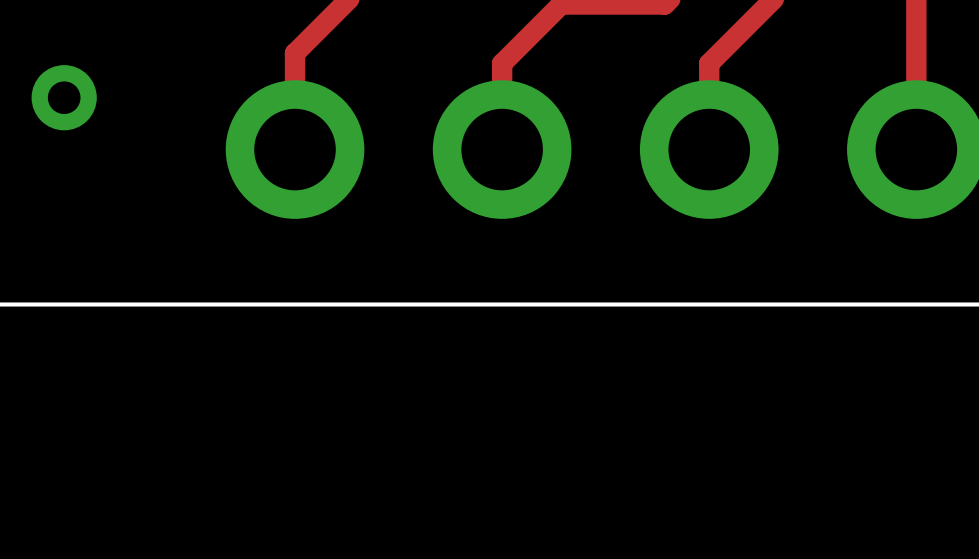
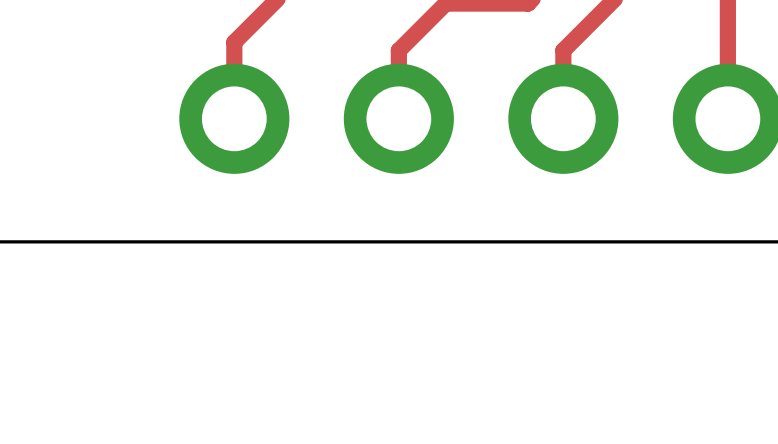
via: (64, 97) -> none

